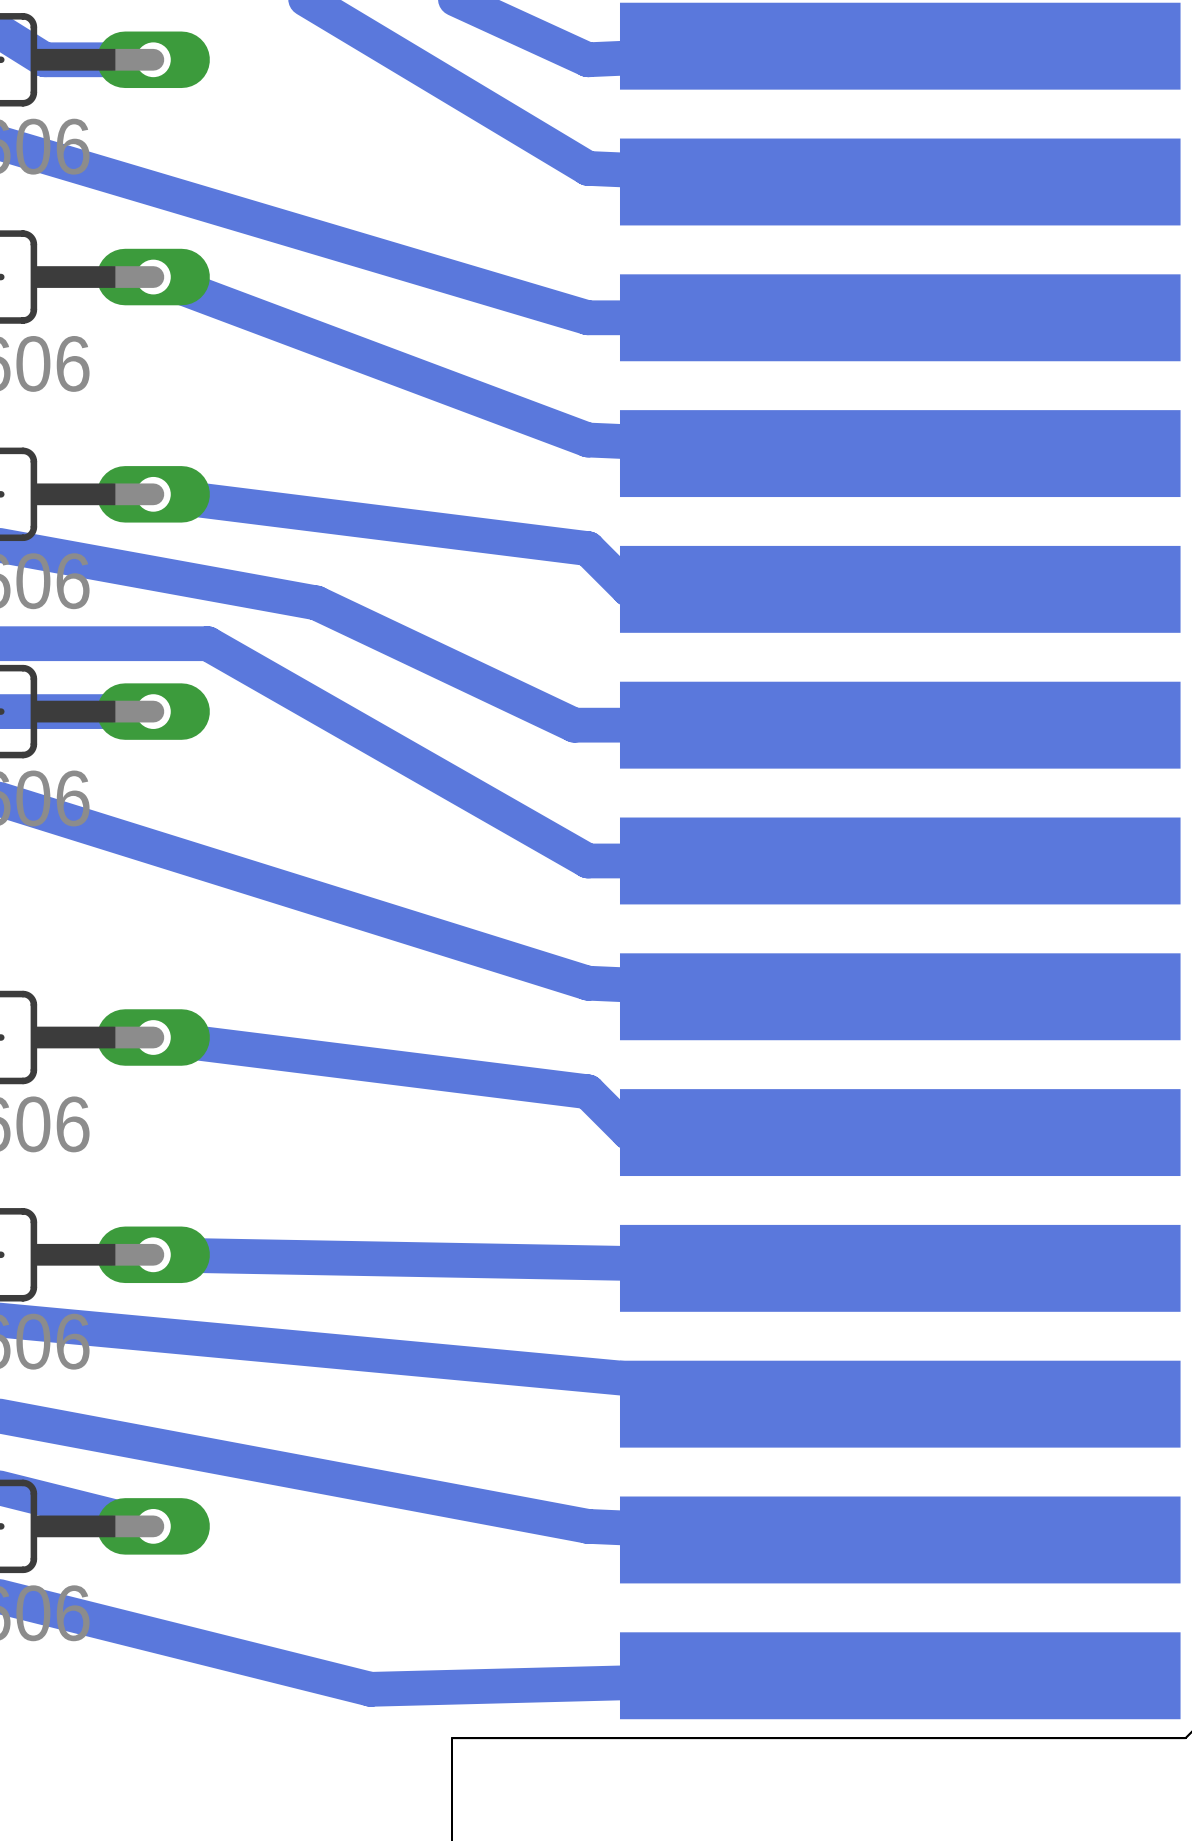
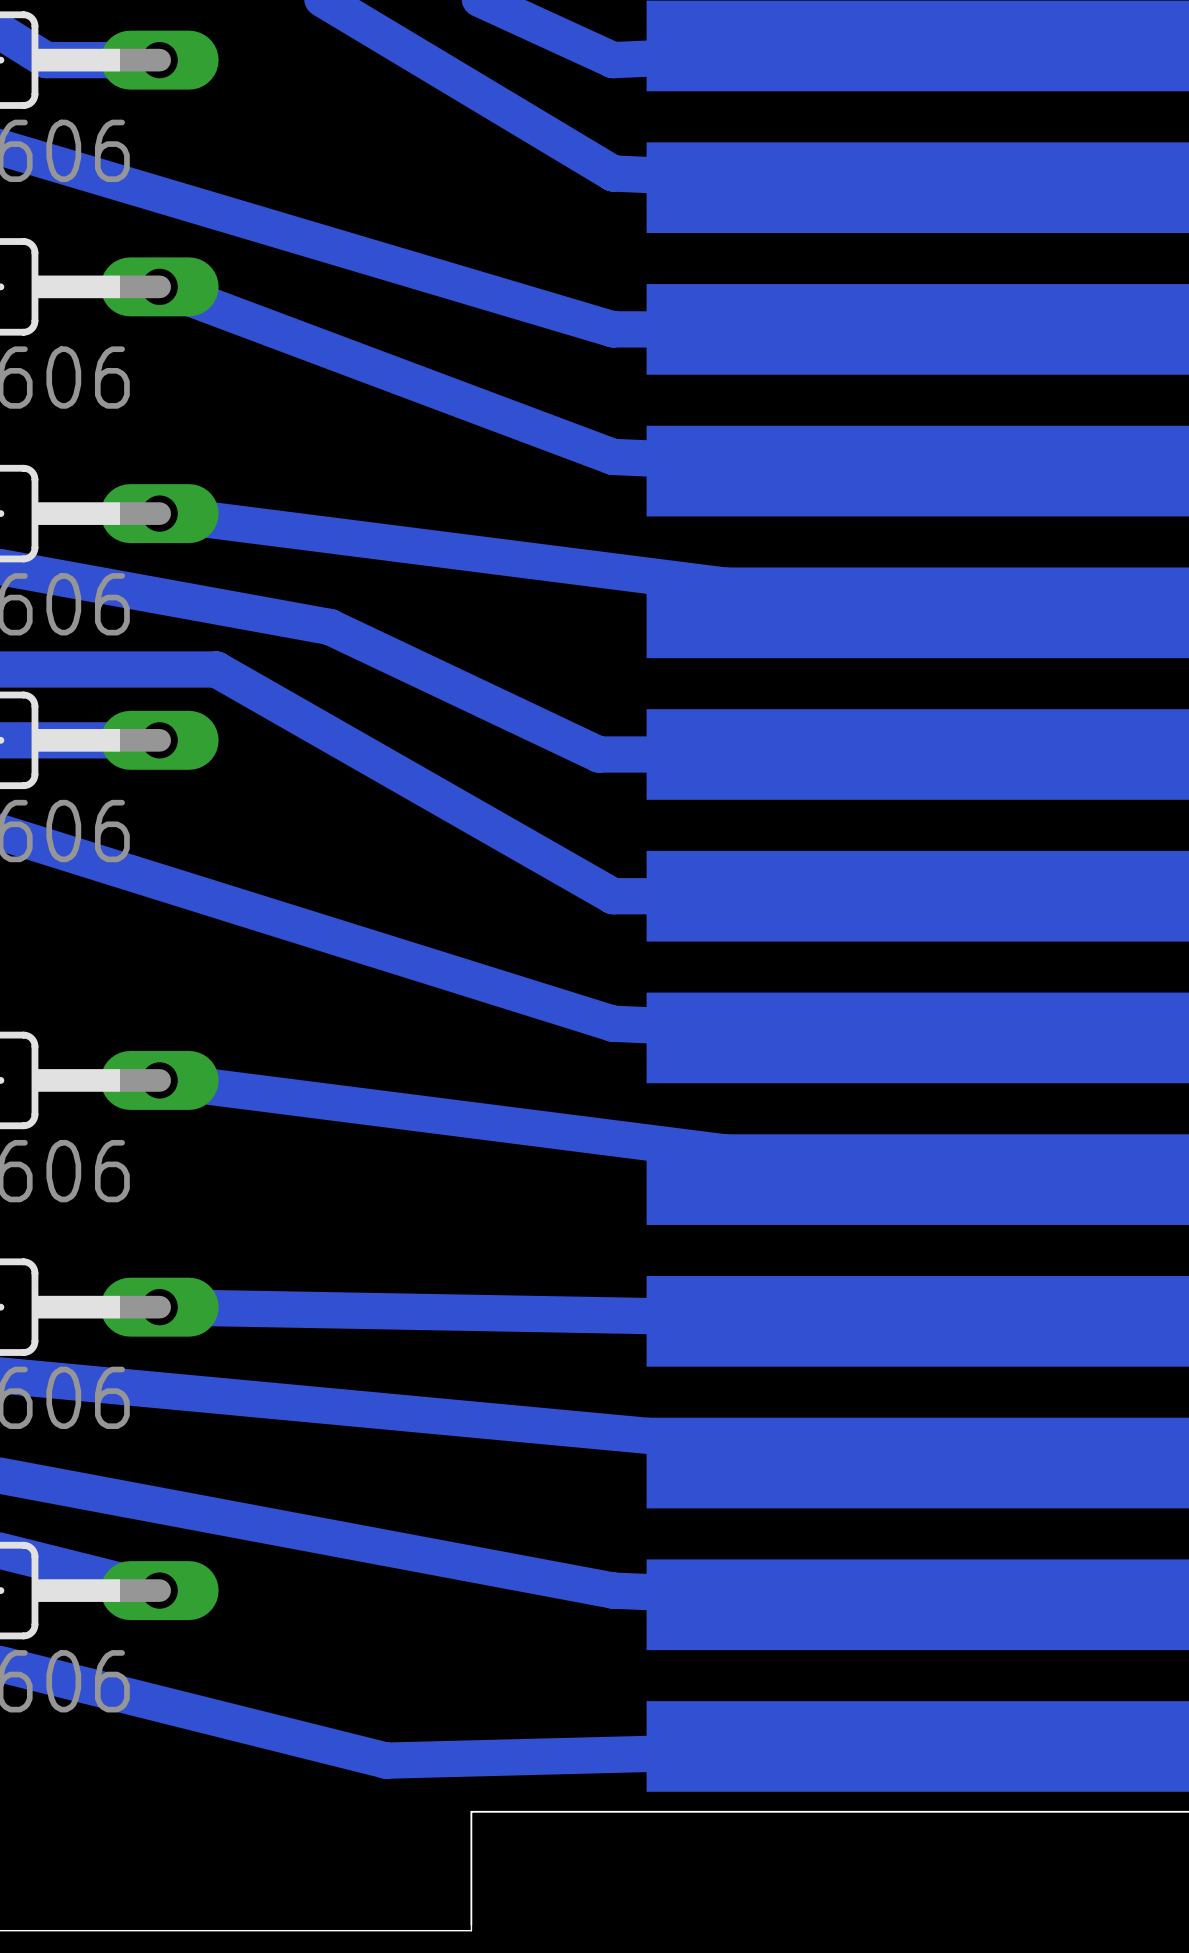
bottom track: (153, 494) (587, 548) (628, 589) (900, 589) -> (159, 513) (939, 612)
bottom track: (153, 1037) (587, 1091) (628, 1132) (900, 1132) -> (159, 1080) (939, 1179)

